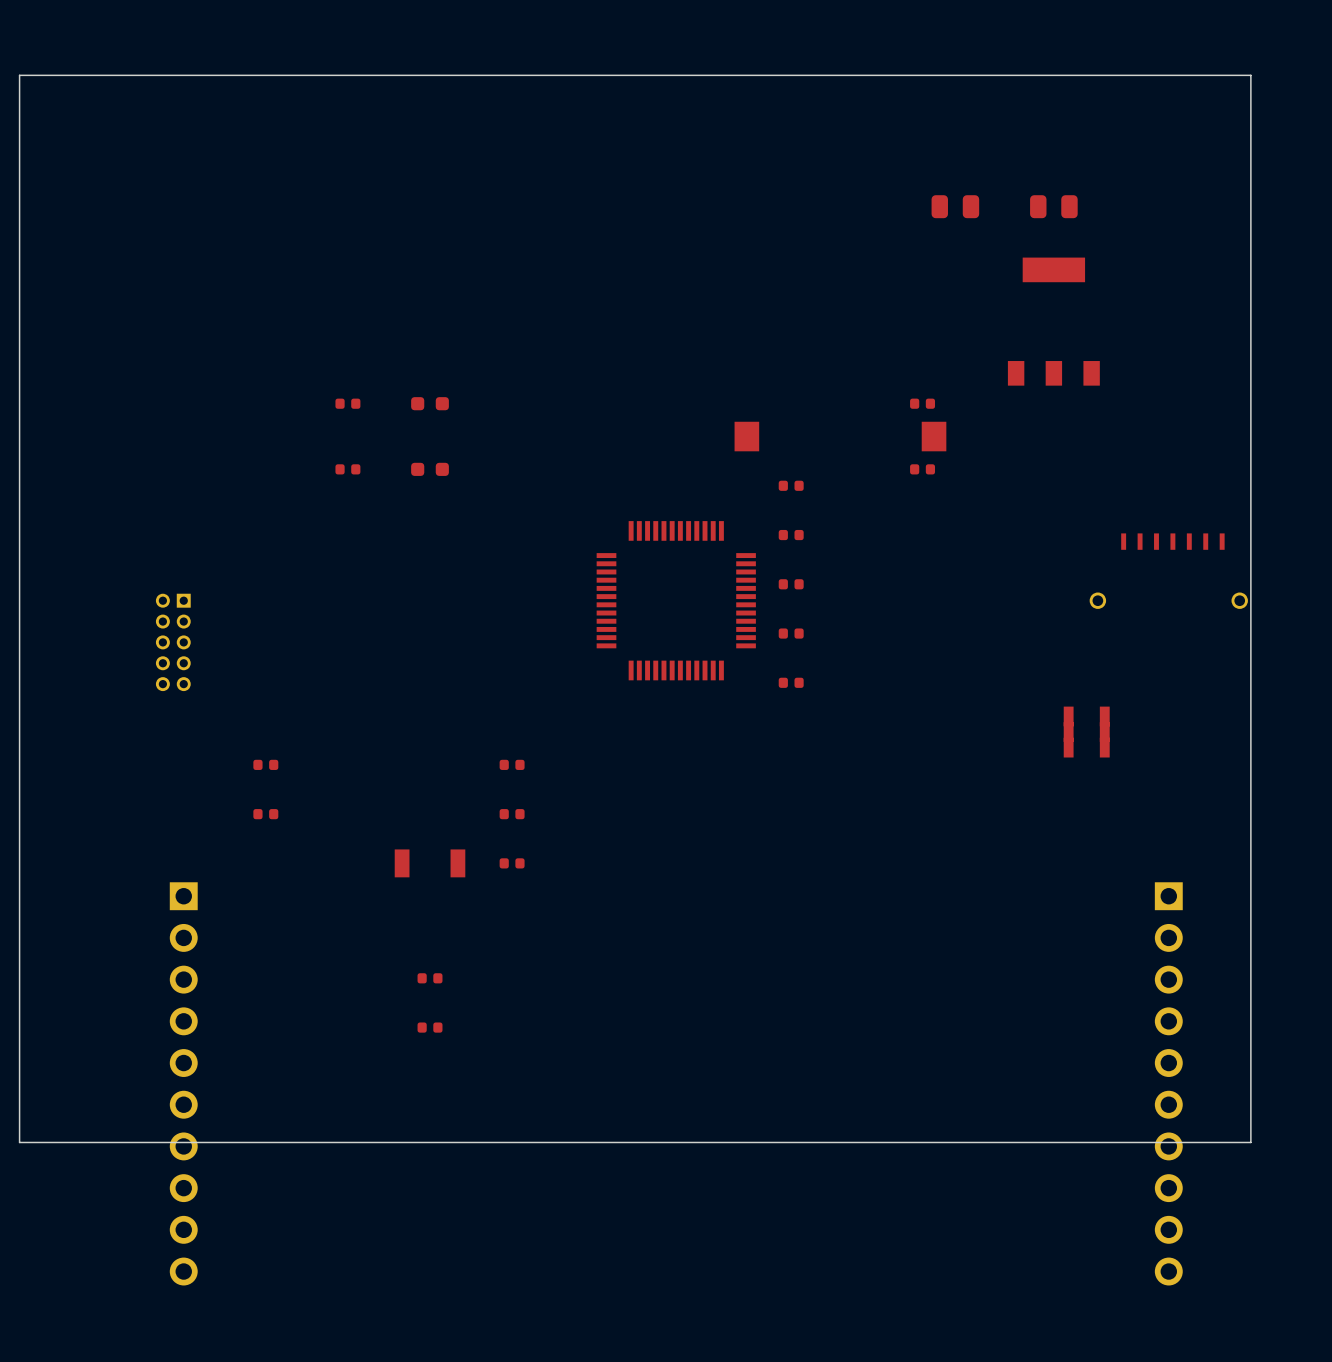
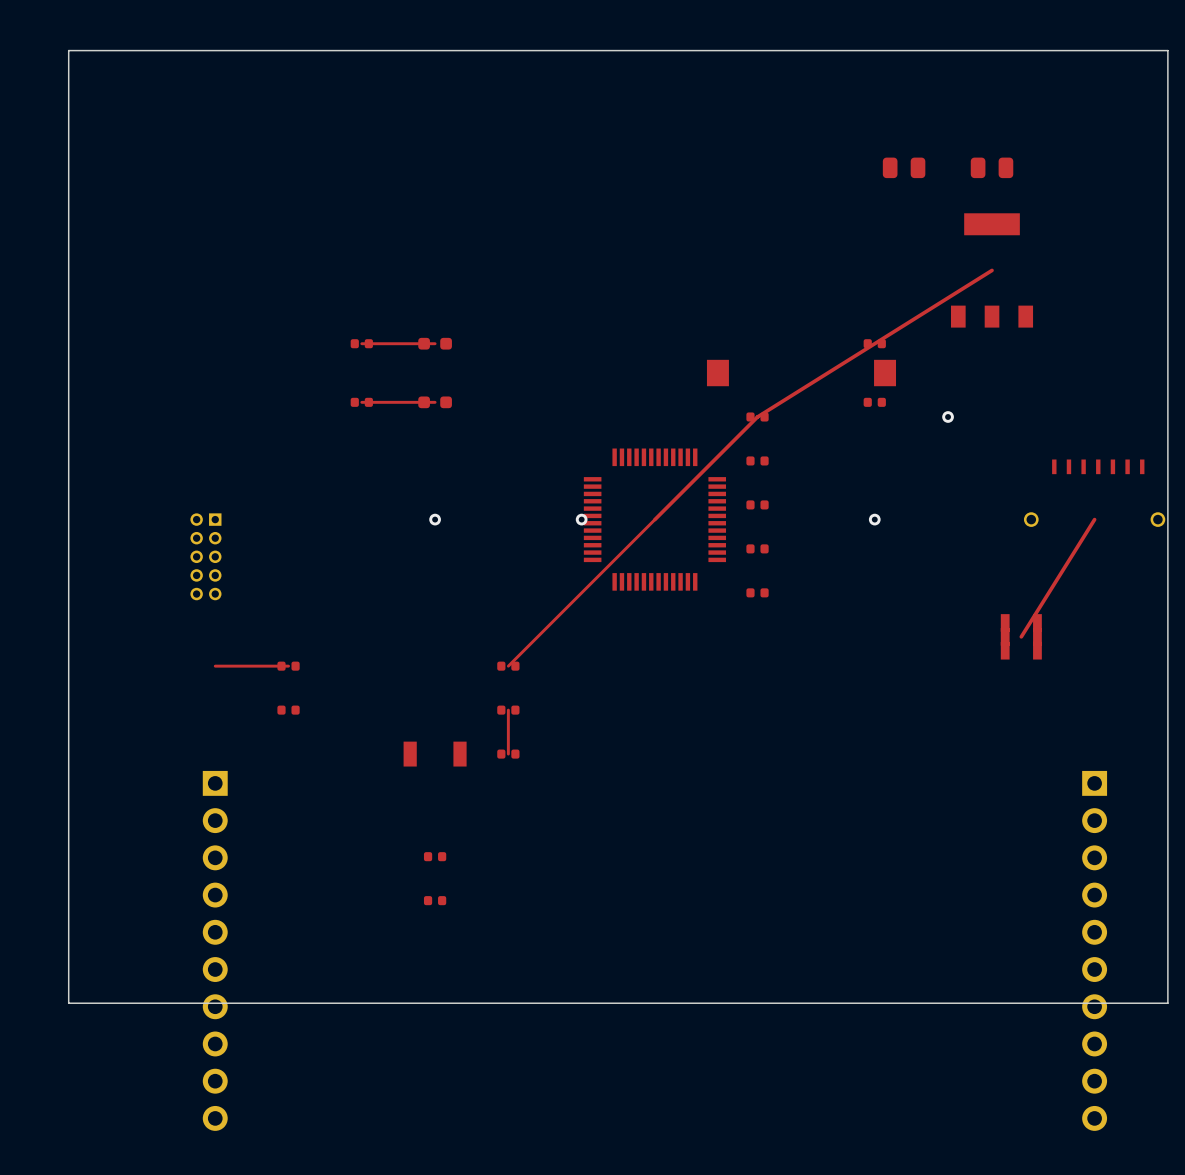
top track: none -> (992, 270) (757, 416) (508, 666)
top track: none -> (435, 343) (361, 343)
top track: none -> (435, 402) (361, 402)
via: none -> (948, 416)
via: none -> (435, 519)
via: none -> (581, 519)
via: none -> (874, 519)
top track: none -> (1094, 519) (1021, 636)
top track: none -> (288, 666) (215, 666)
top track: none -> (508, 710) (508, 754)

